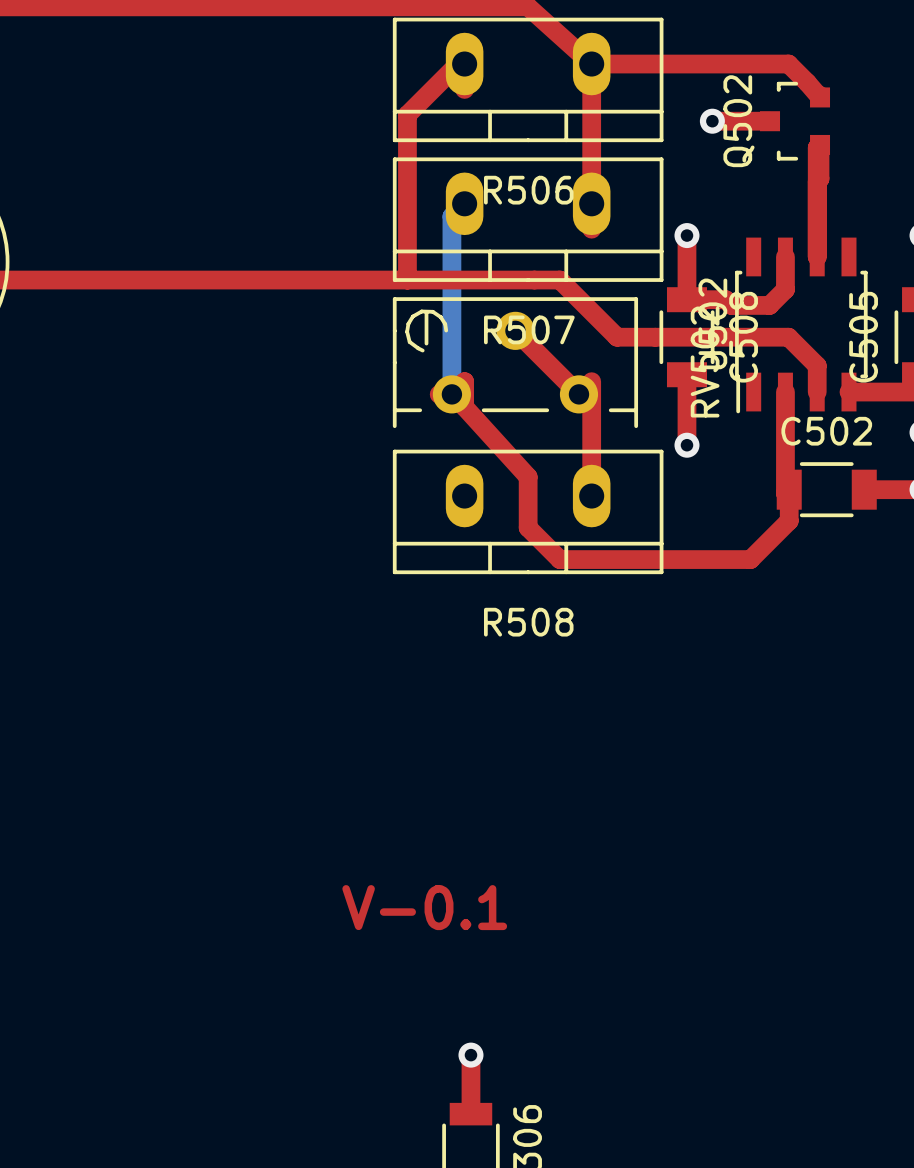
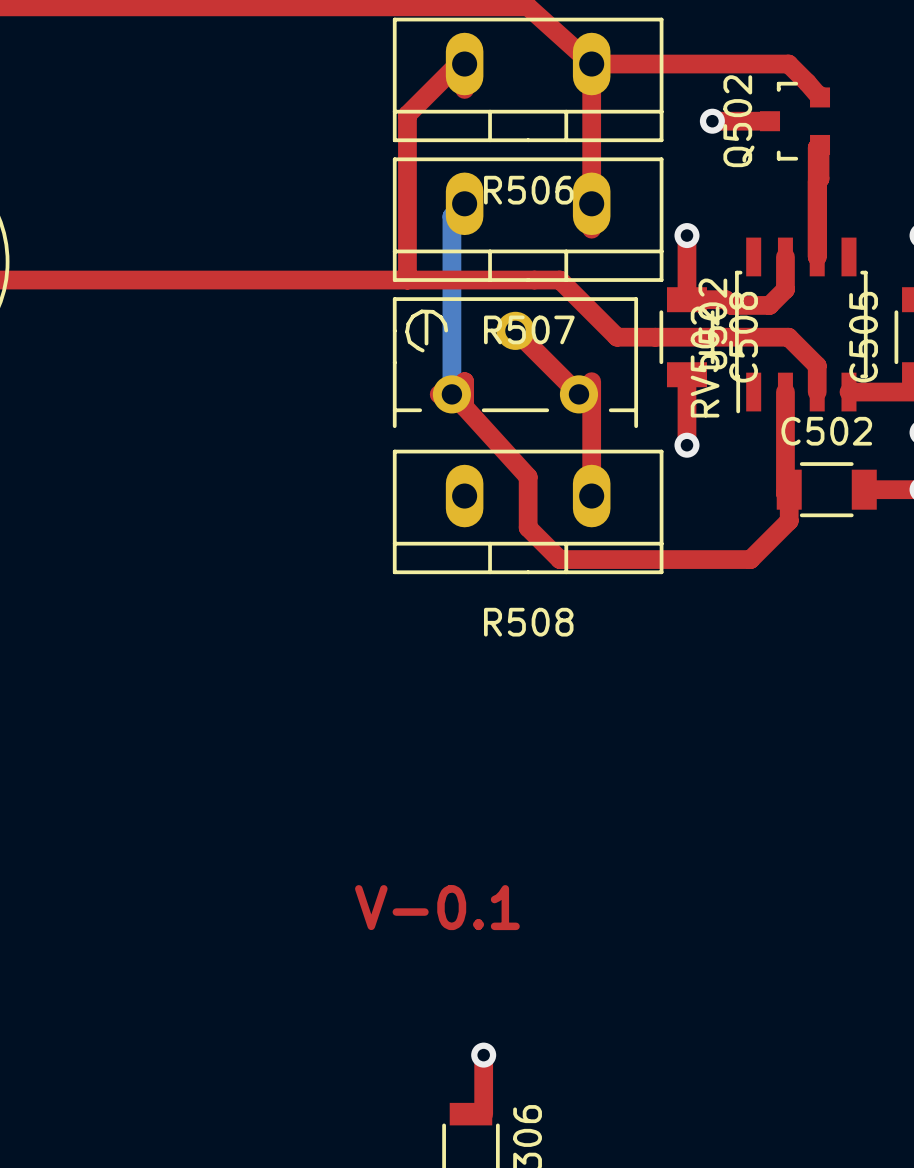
text position: V-0.1 (424, 907) -> V-0.1 (437, 907)
top track: (470, 1055) (470, 1114) -> (483, 1055) (483, 1114)
via position: (470, 1055) -> (483, 1055)

